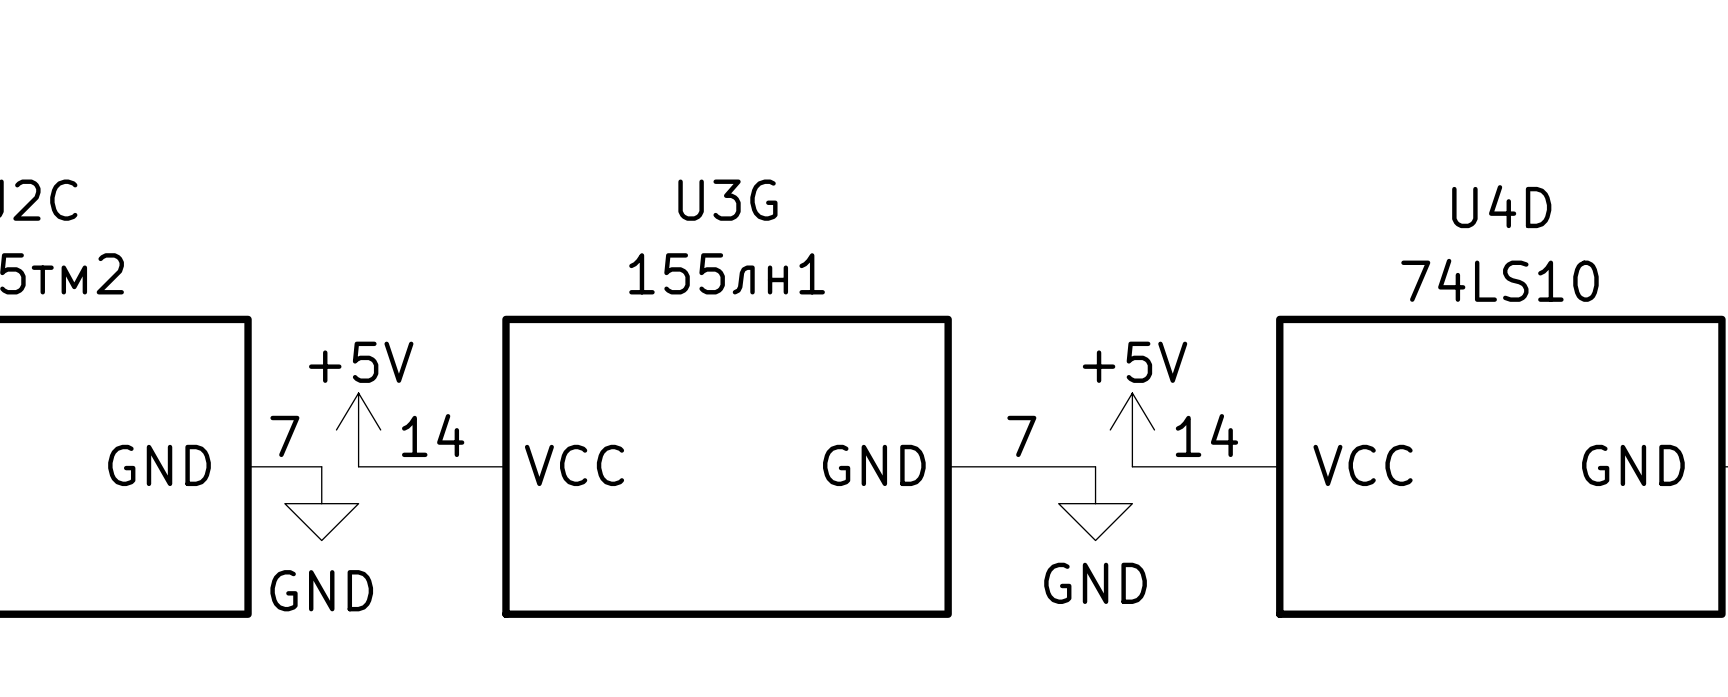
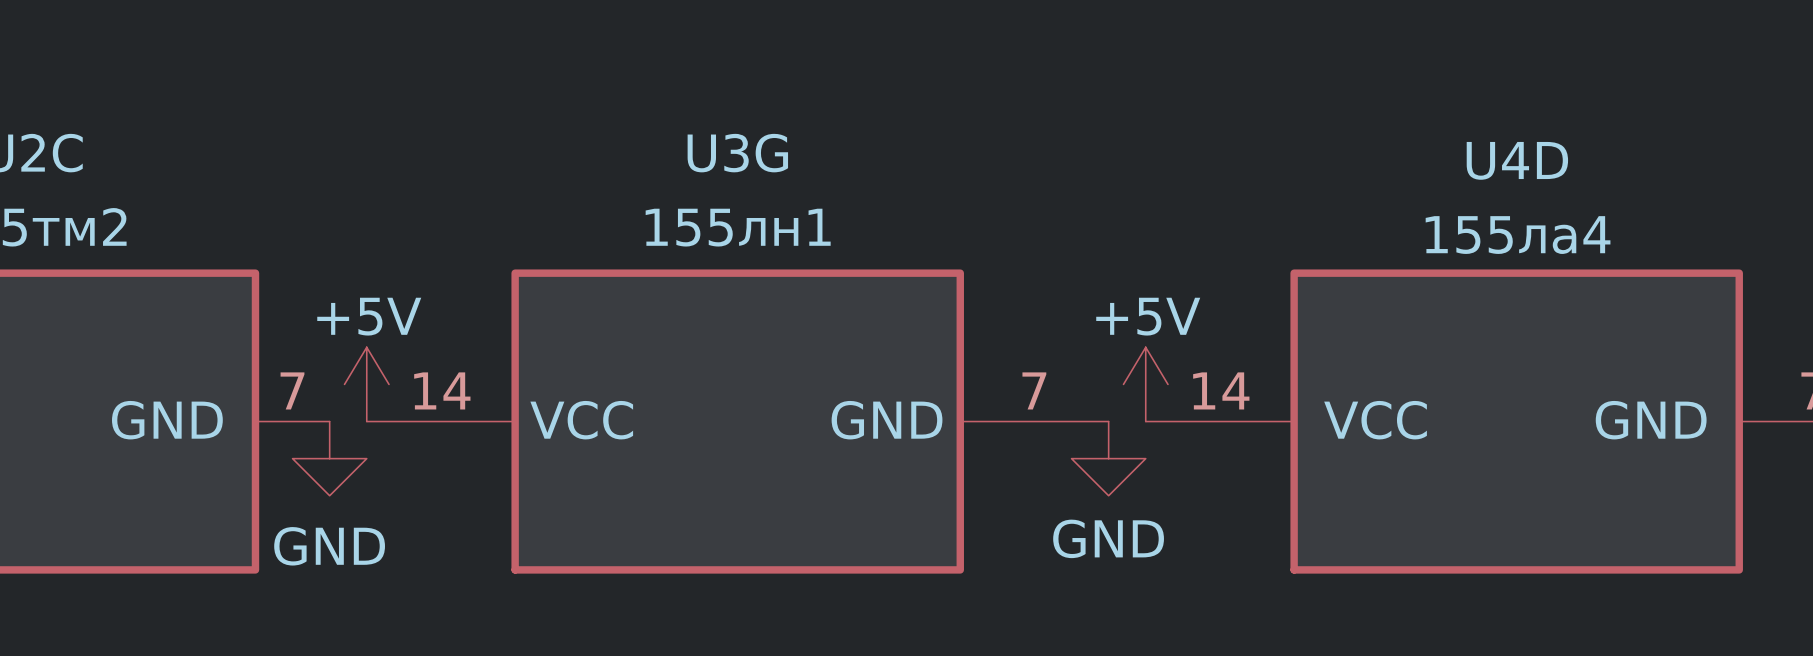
U4D value: 74LS10 (1499, 280) -> 155ла4 (1518, 235)

